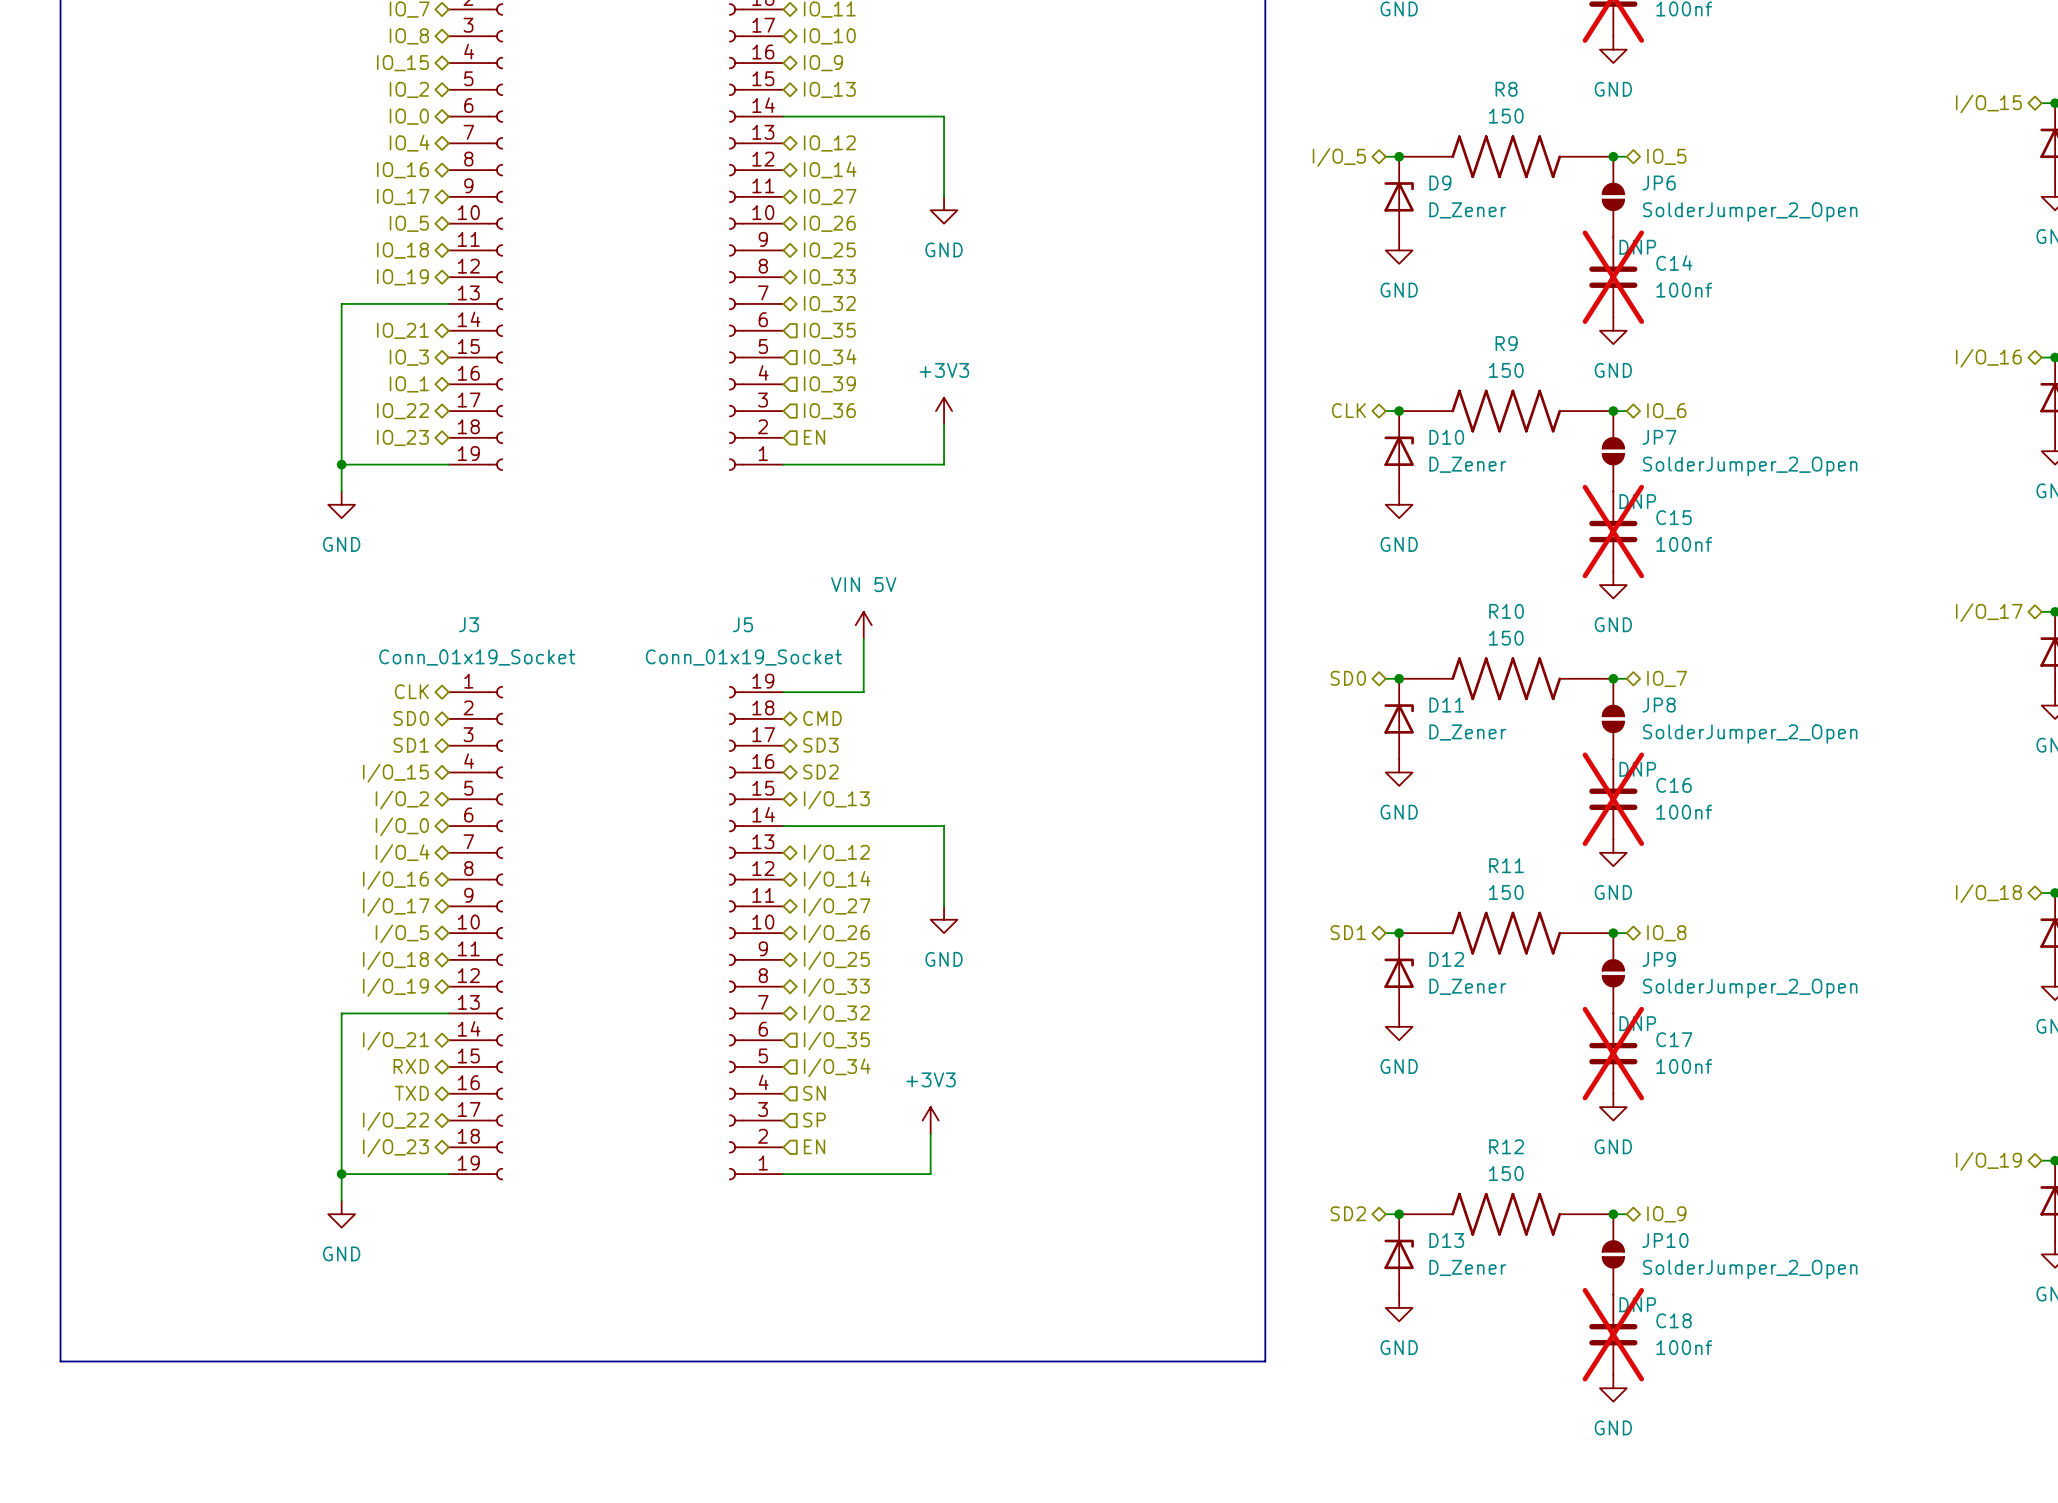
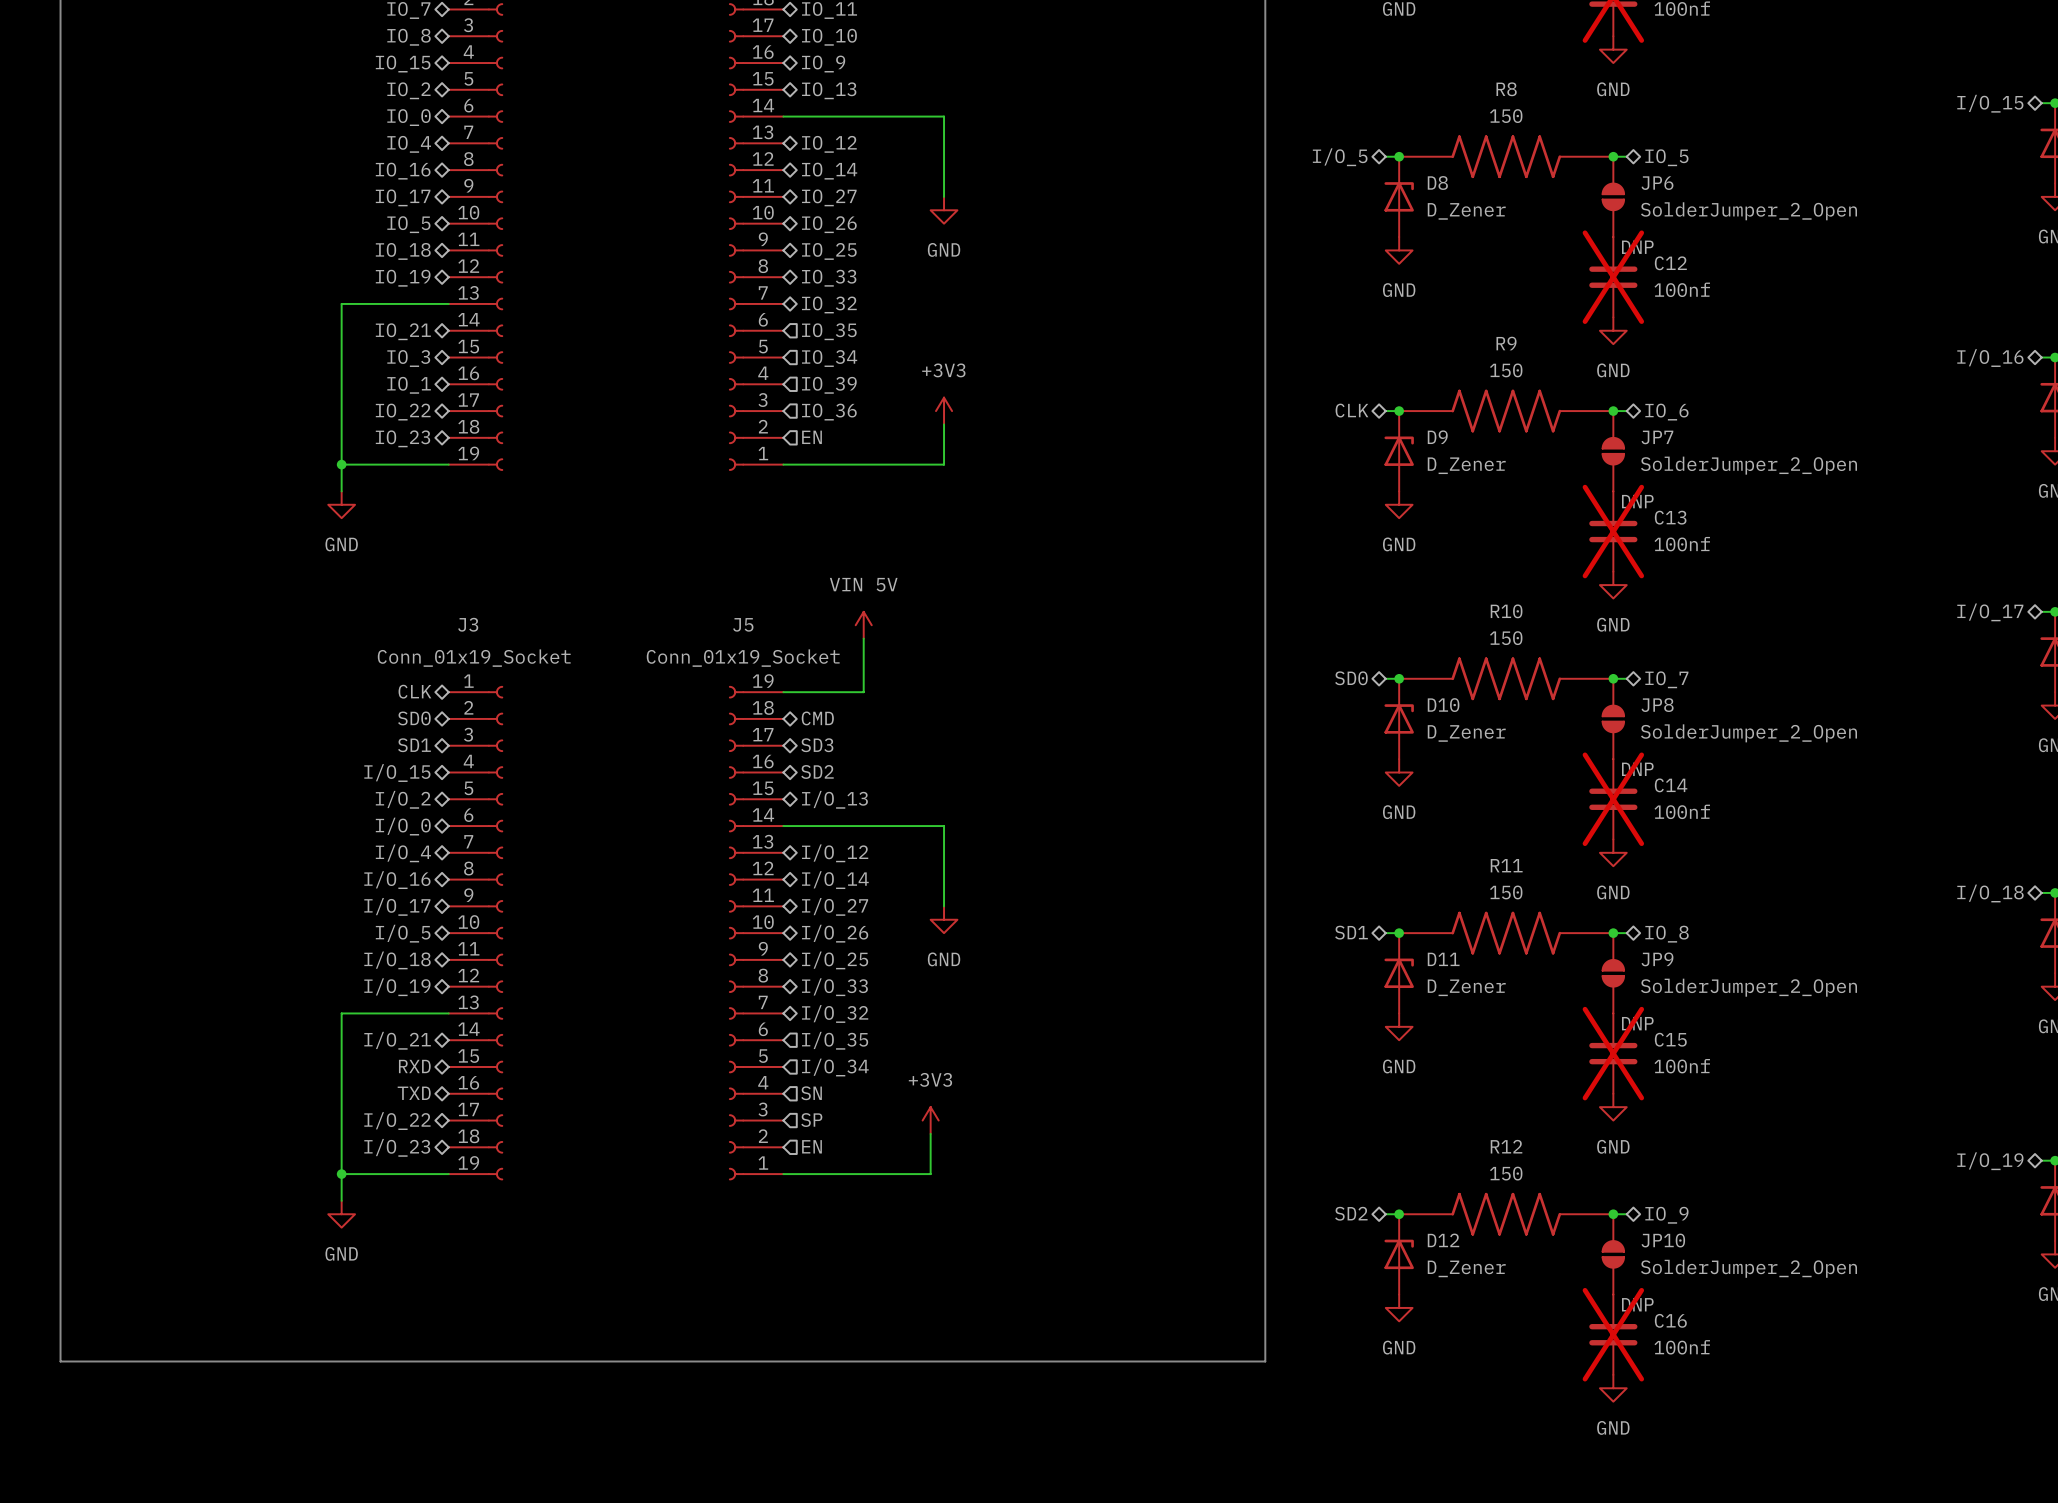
D9 name: D9 (1440, 183) -> D8 (1437, 183)
C14 name: C14 (1674, 262) -> C12 (1670, 263)
D10 name: D10 (1446, 437) -> D9 (1437, 437)
C15 name: C15 (1674, 517) -> C13 (1670, 517)
D11 name: D11 (1446, 705) -> D10 (1443, 705)
C16 name: C16 (1674, 785) -> C14 (1671, 785)
D12 name: D12 (1446, 959) -> D11 (1443, 959)
C17 name: C17 (1674, 1039) -> C15 (1670, 1039)
D13 name: D13 (1446, 1240) -> D12 (1443, 1240)
C18 name: C18 (1674, 1320) -> C16 (1670, 1320)

